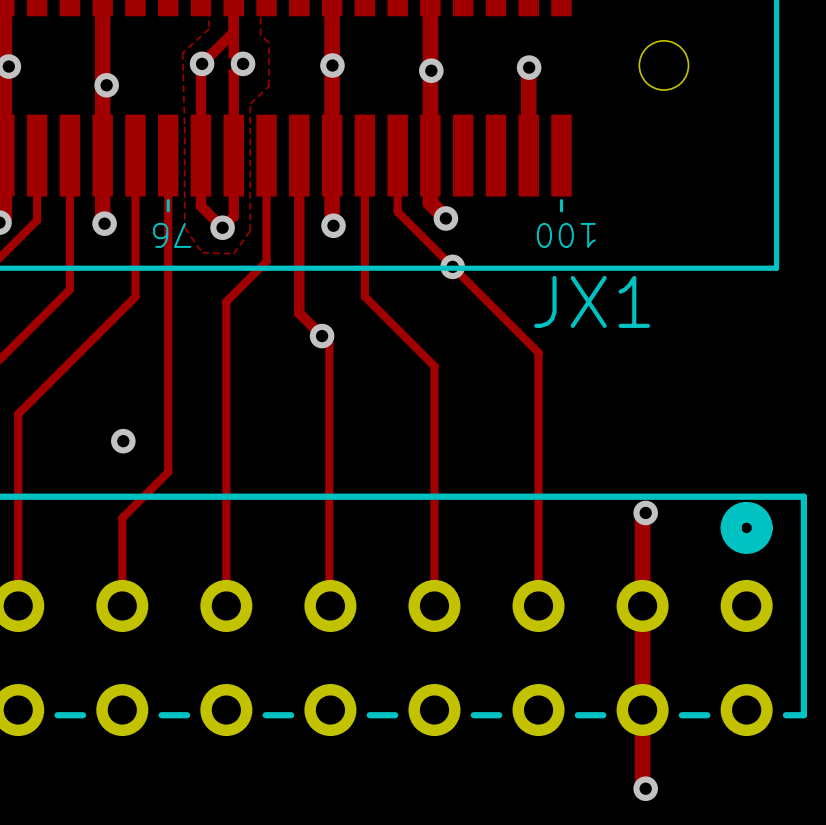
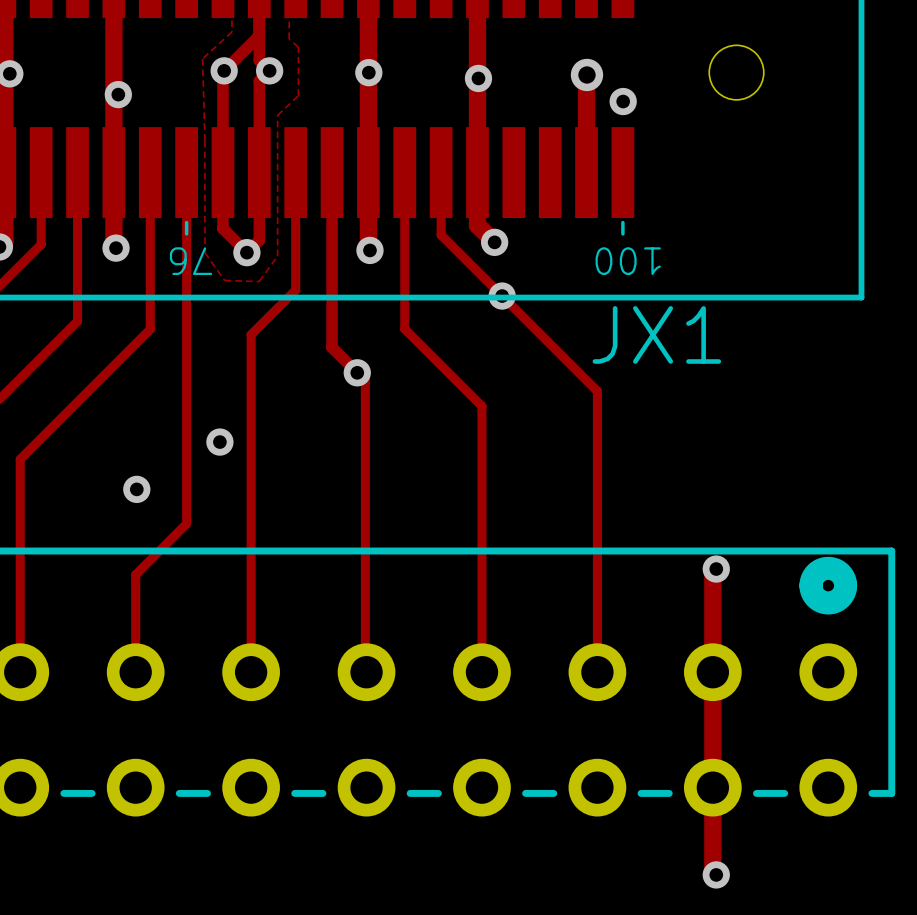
via position: (529, 67) -> (623, 101)
via: none -> (586, 74)
via: none -> (219, 442)

